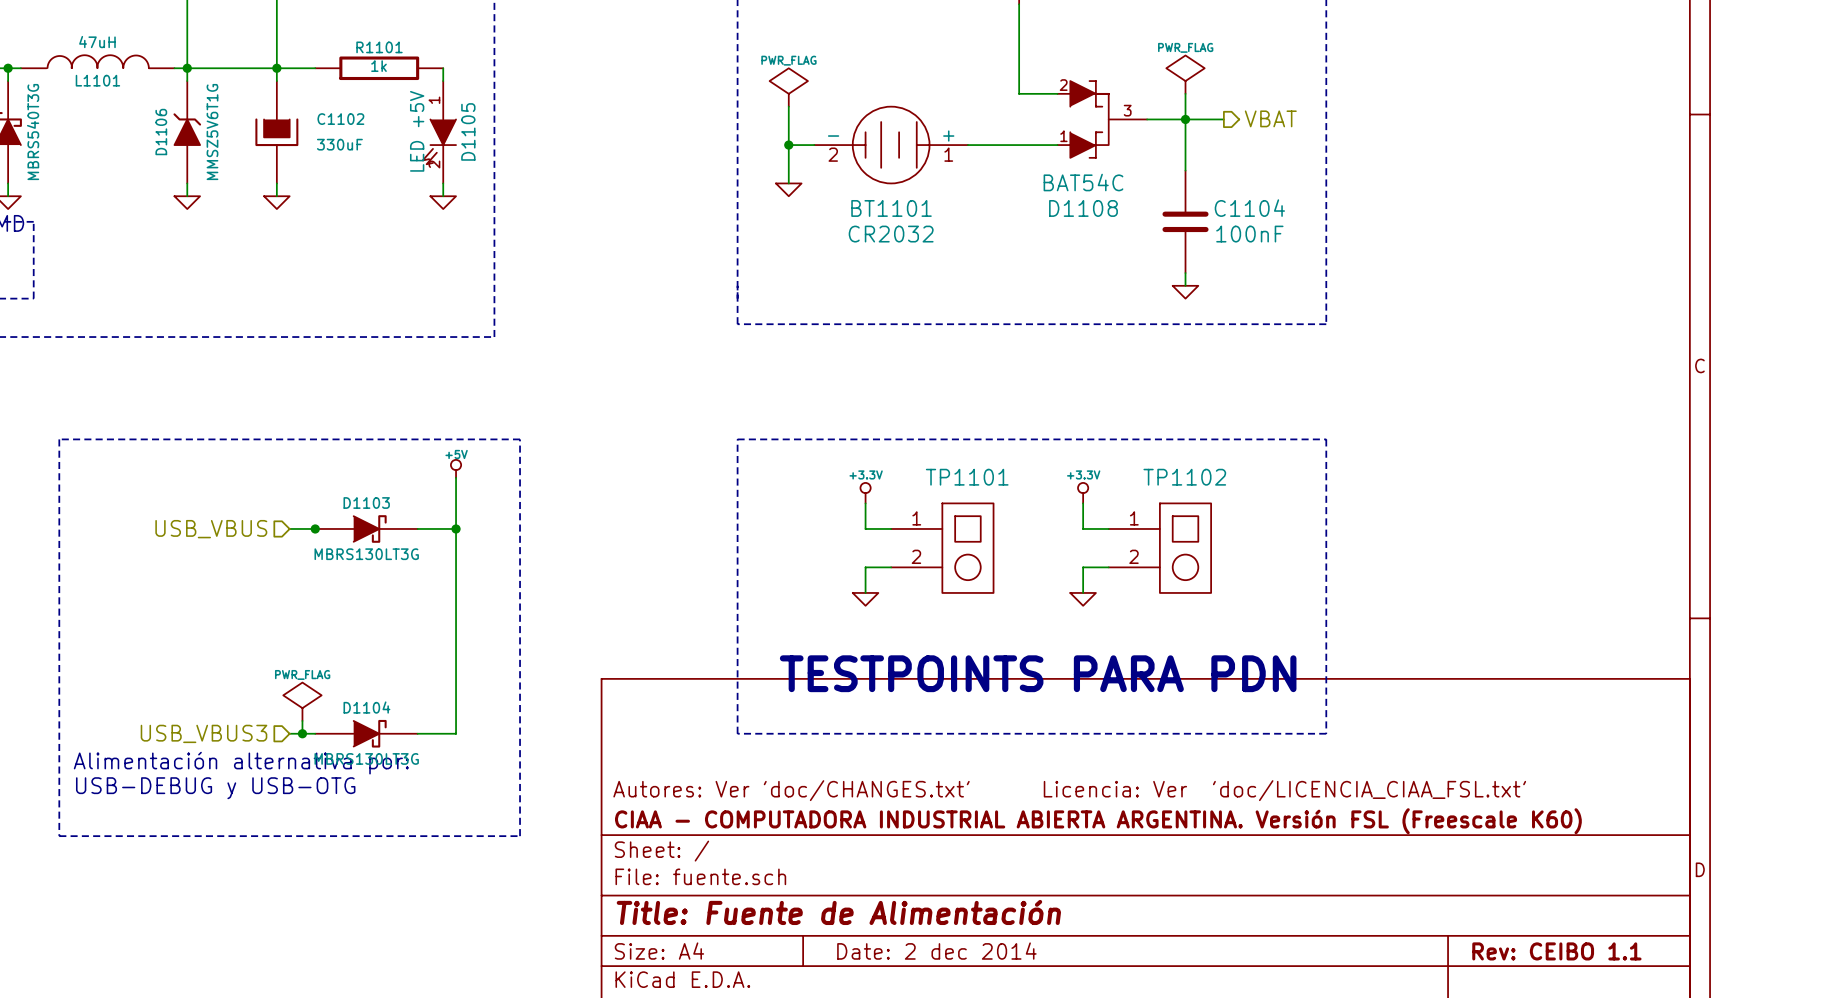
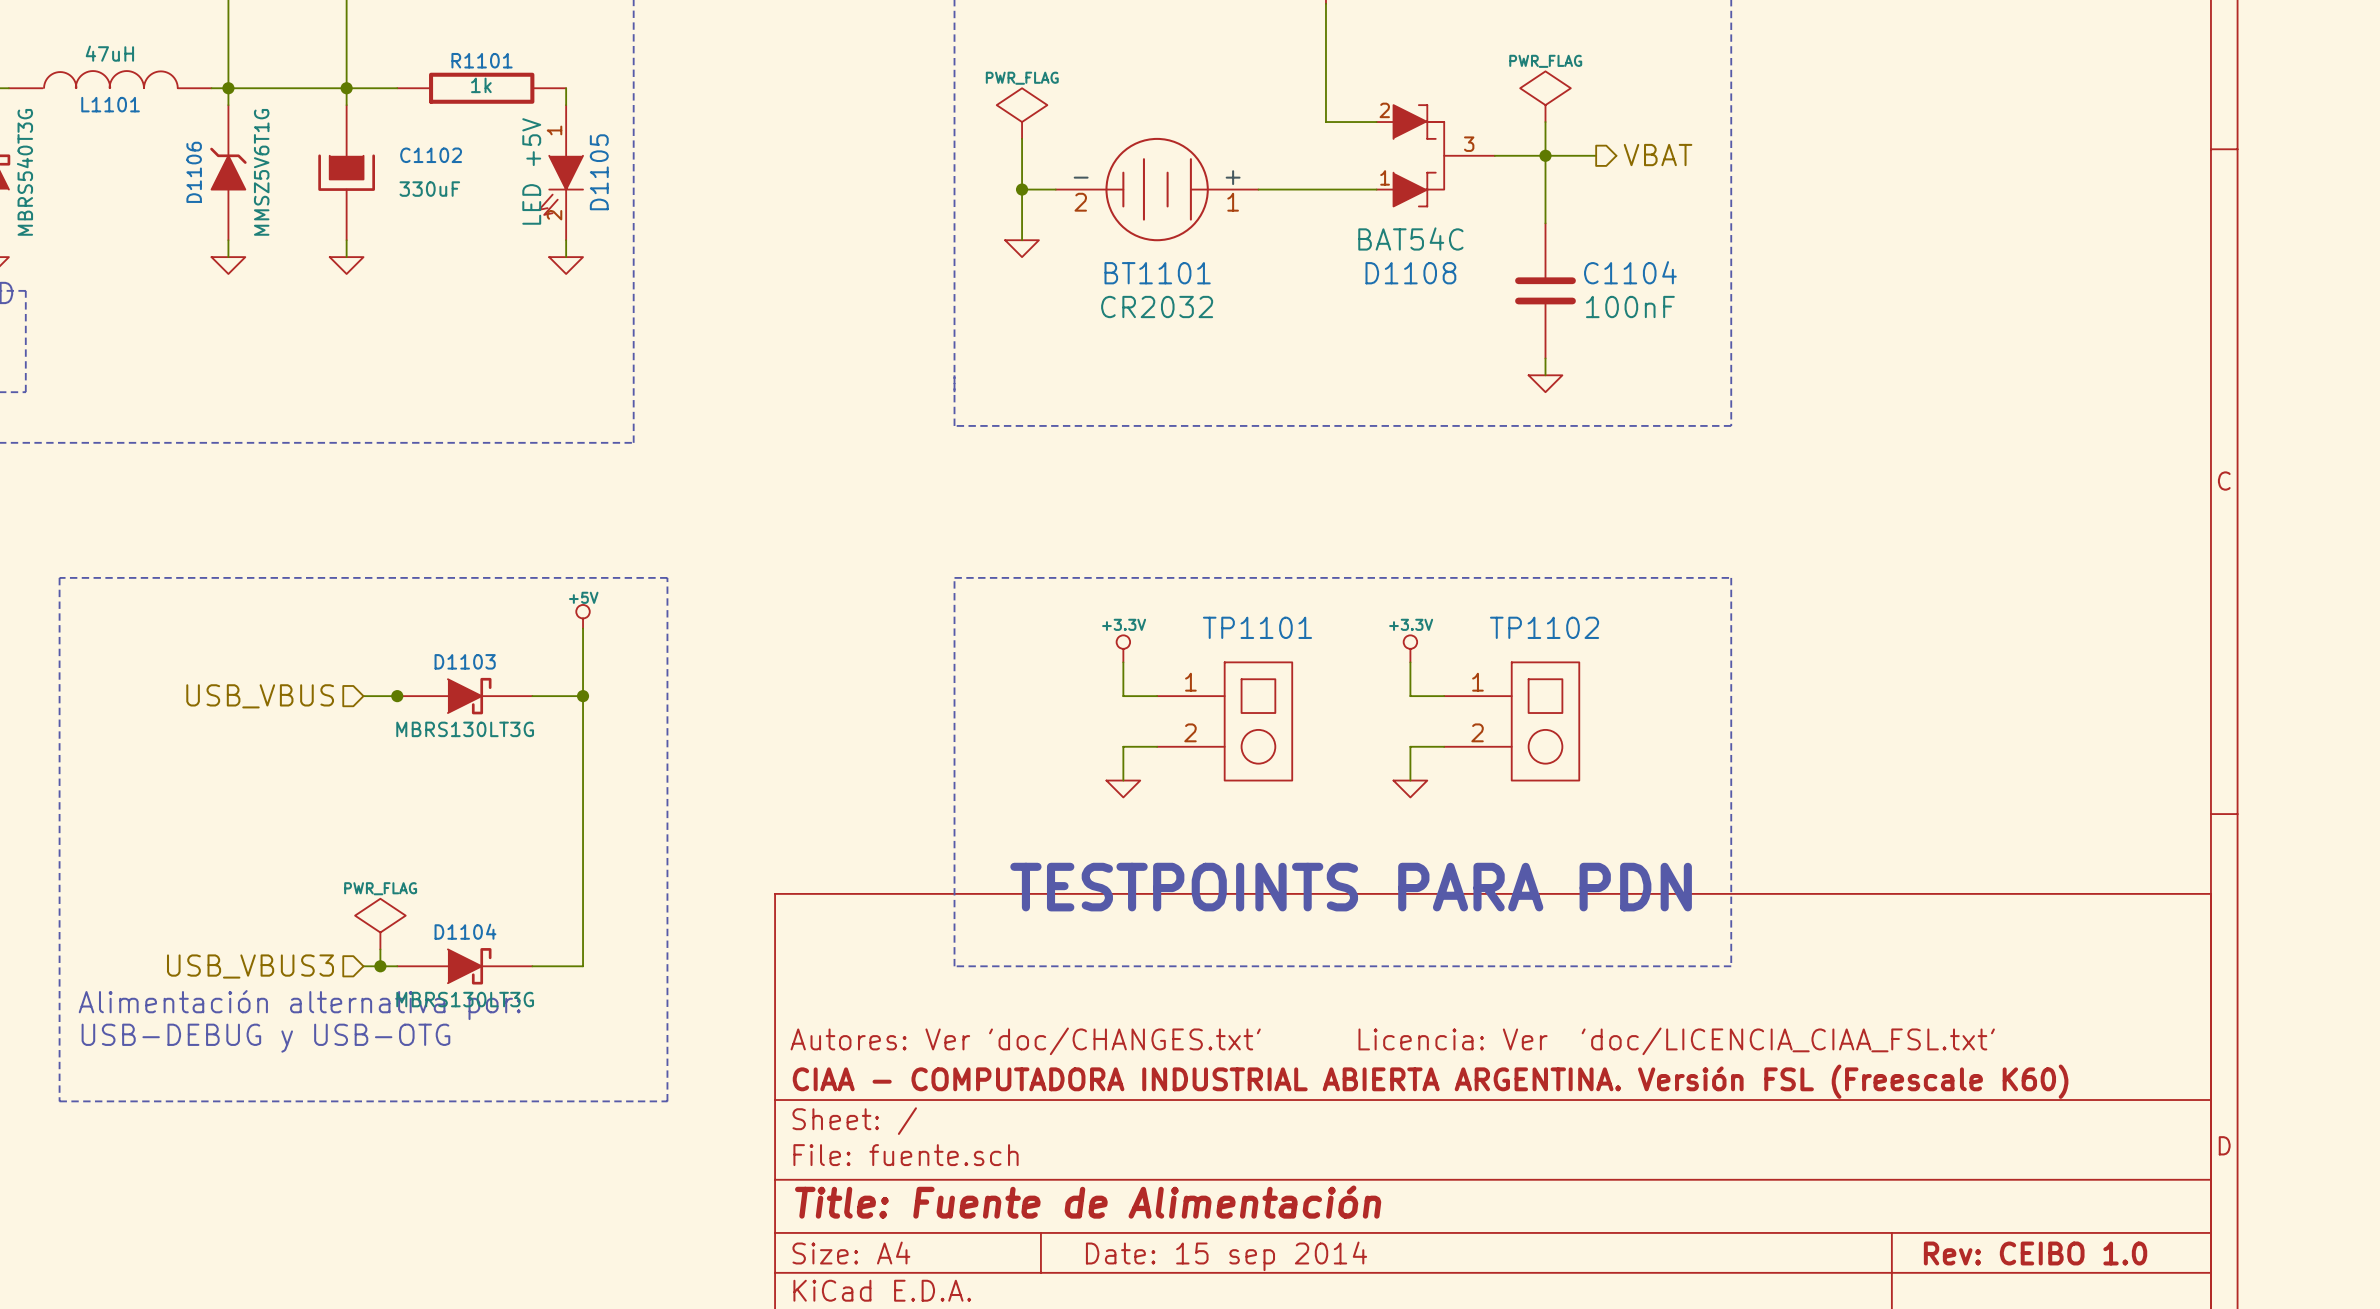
title block: Date: 2 dec 2014 (936, 951) -> Date: 15 sep 2014 (1226, 1256)
title block: Rev: CEIBO 1.1 (1556, 951) -> Rev: CEIBO 1.0 (2035, 1253)

